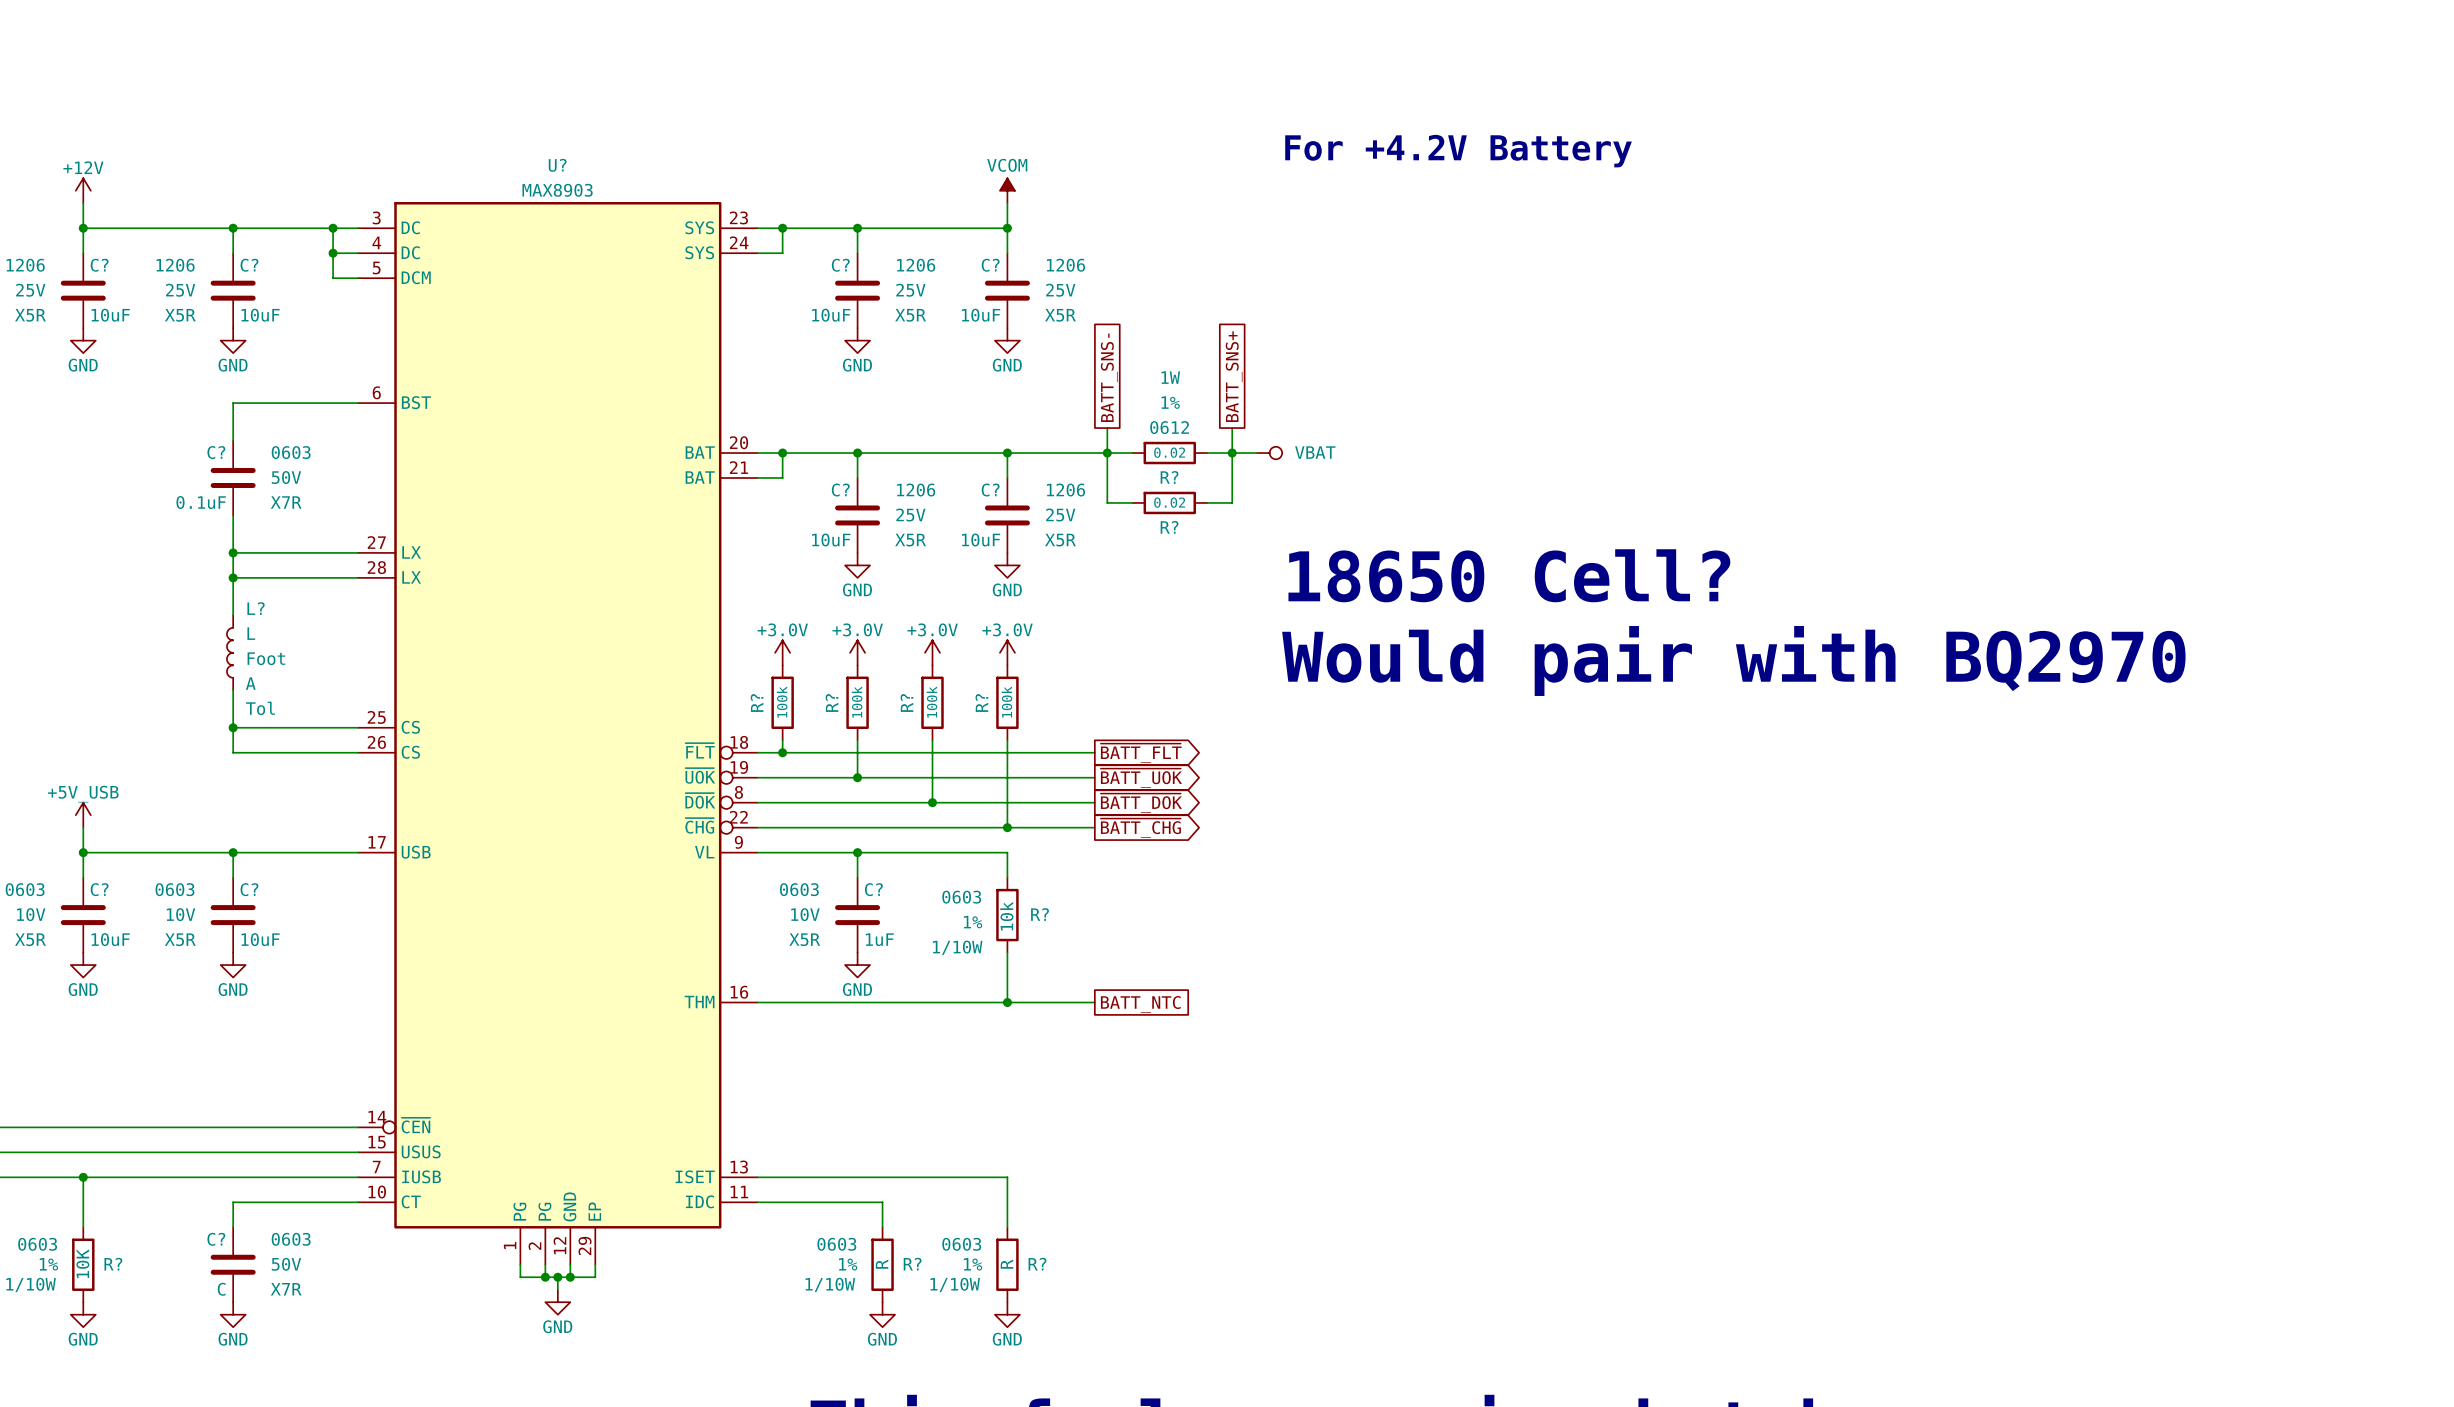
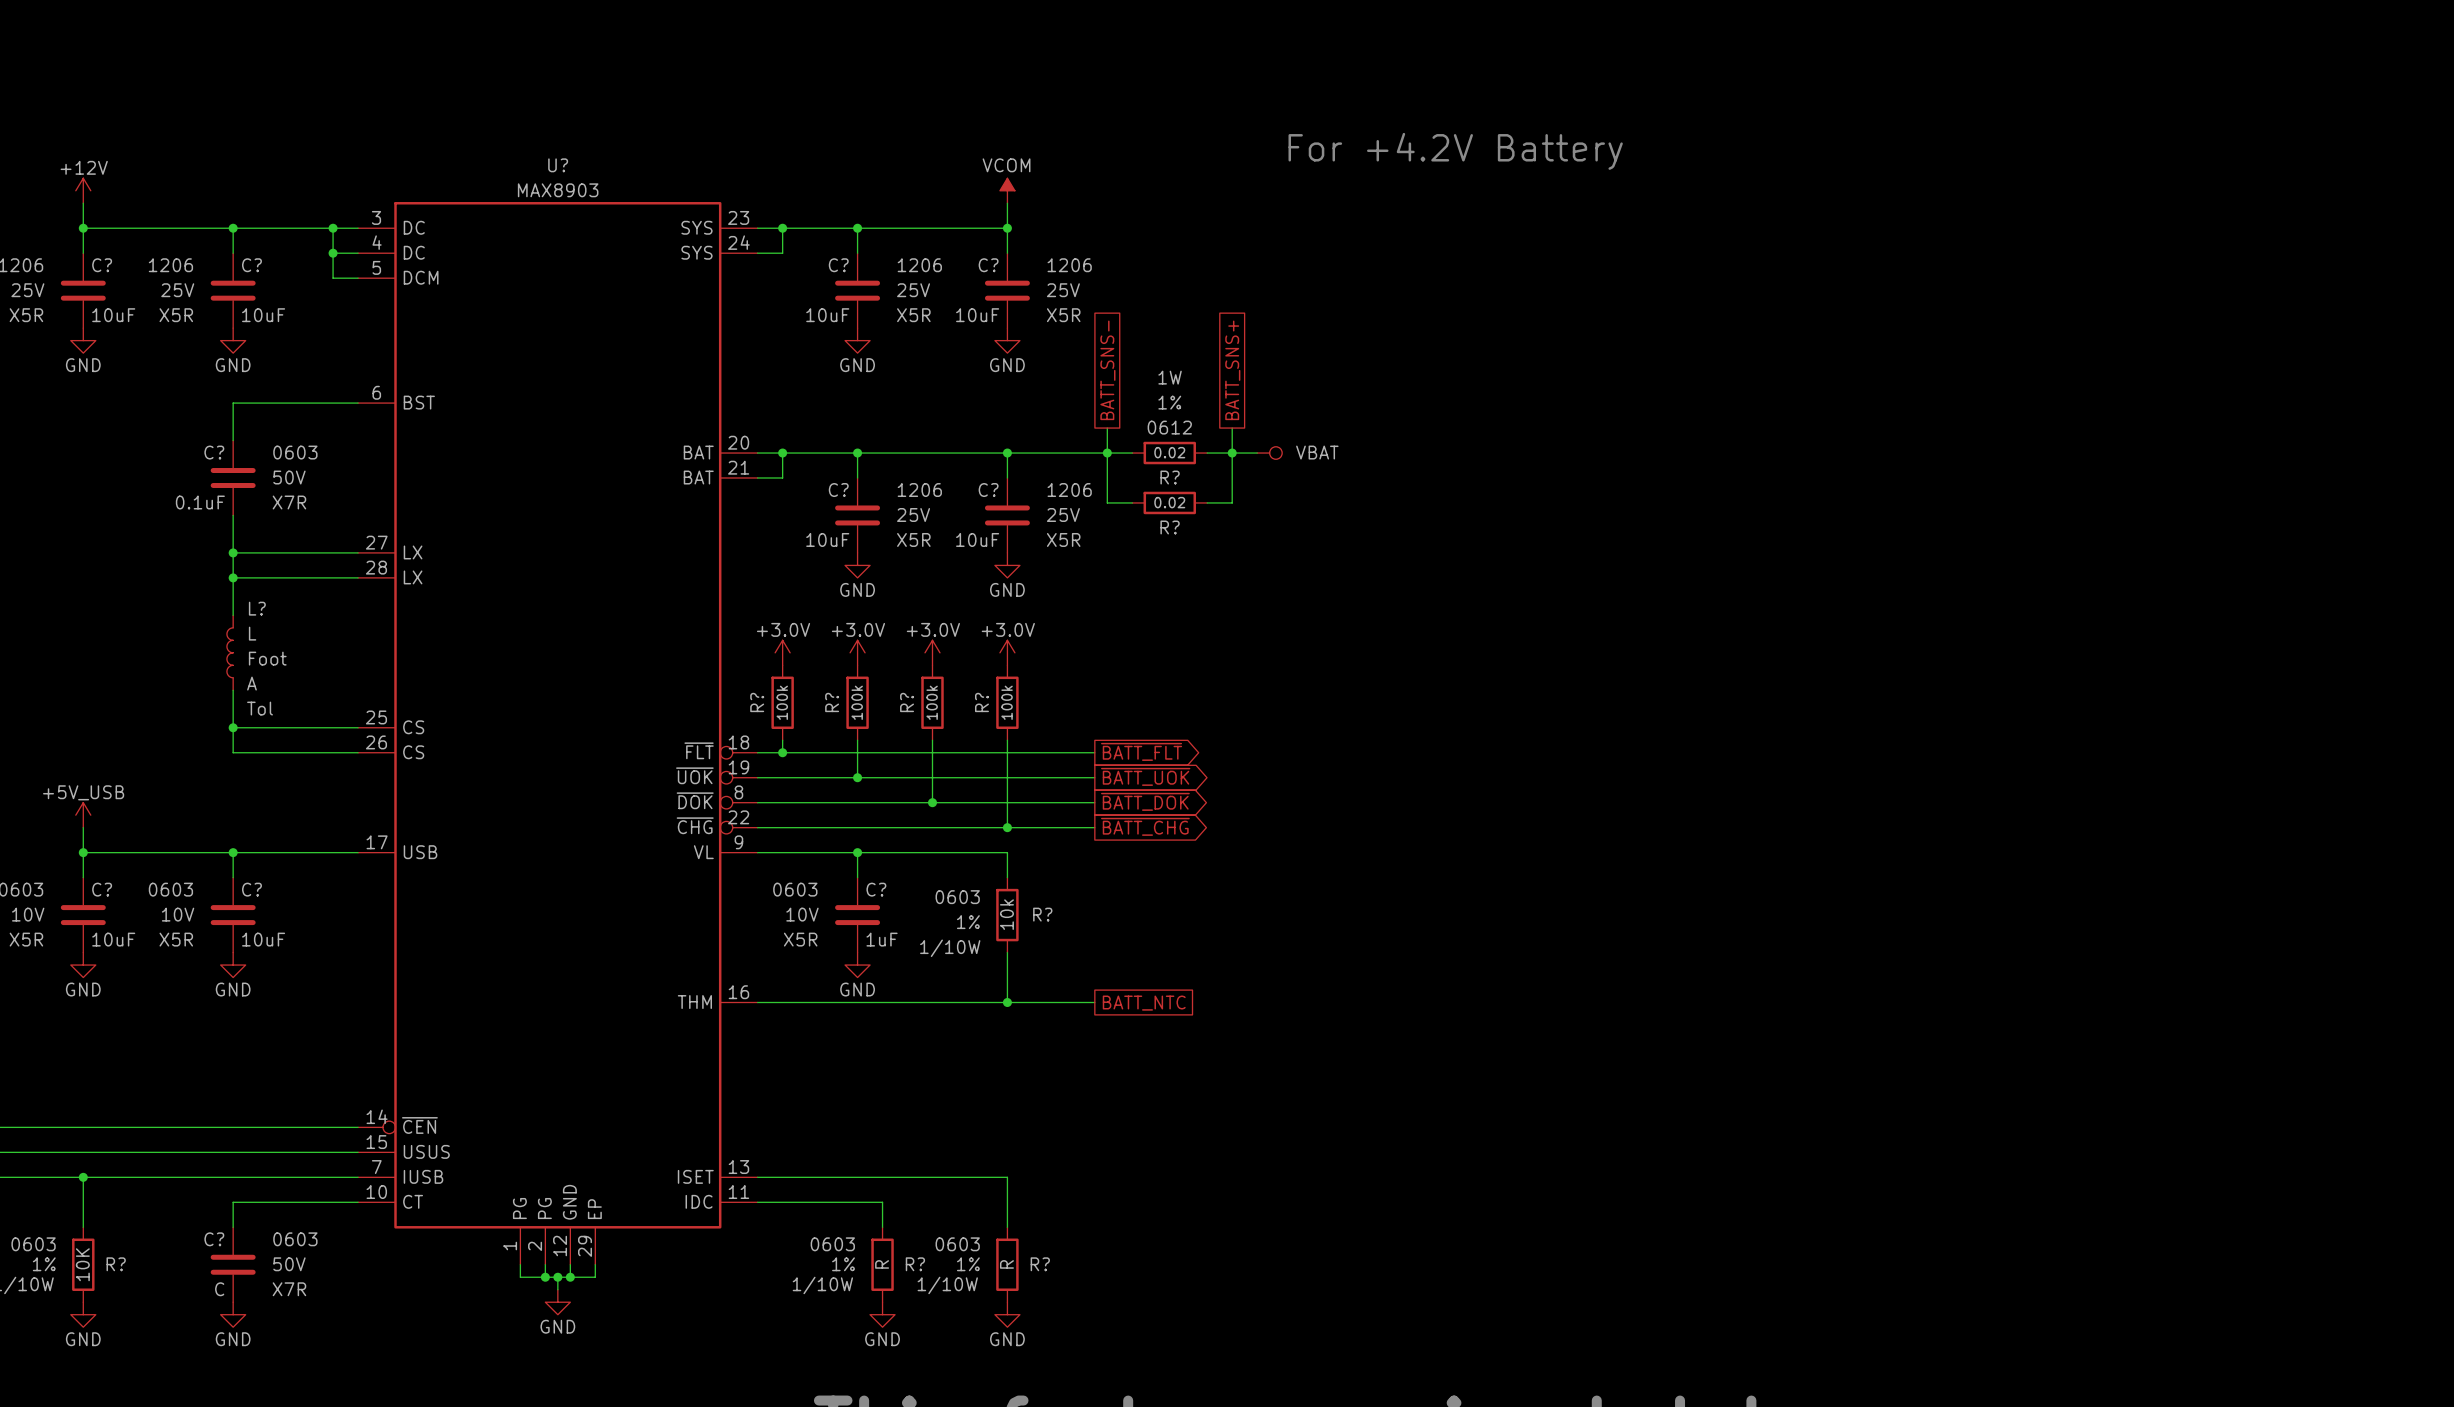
text: 18650 Cell? (1509, 575) -> none
text: Would pair with BQ2970 (1733, 661) -> none

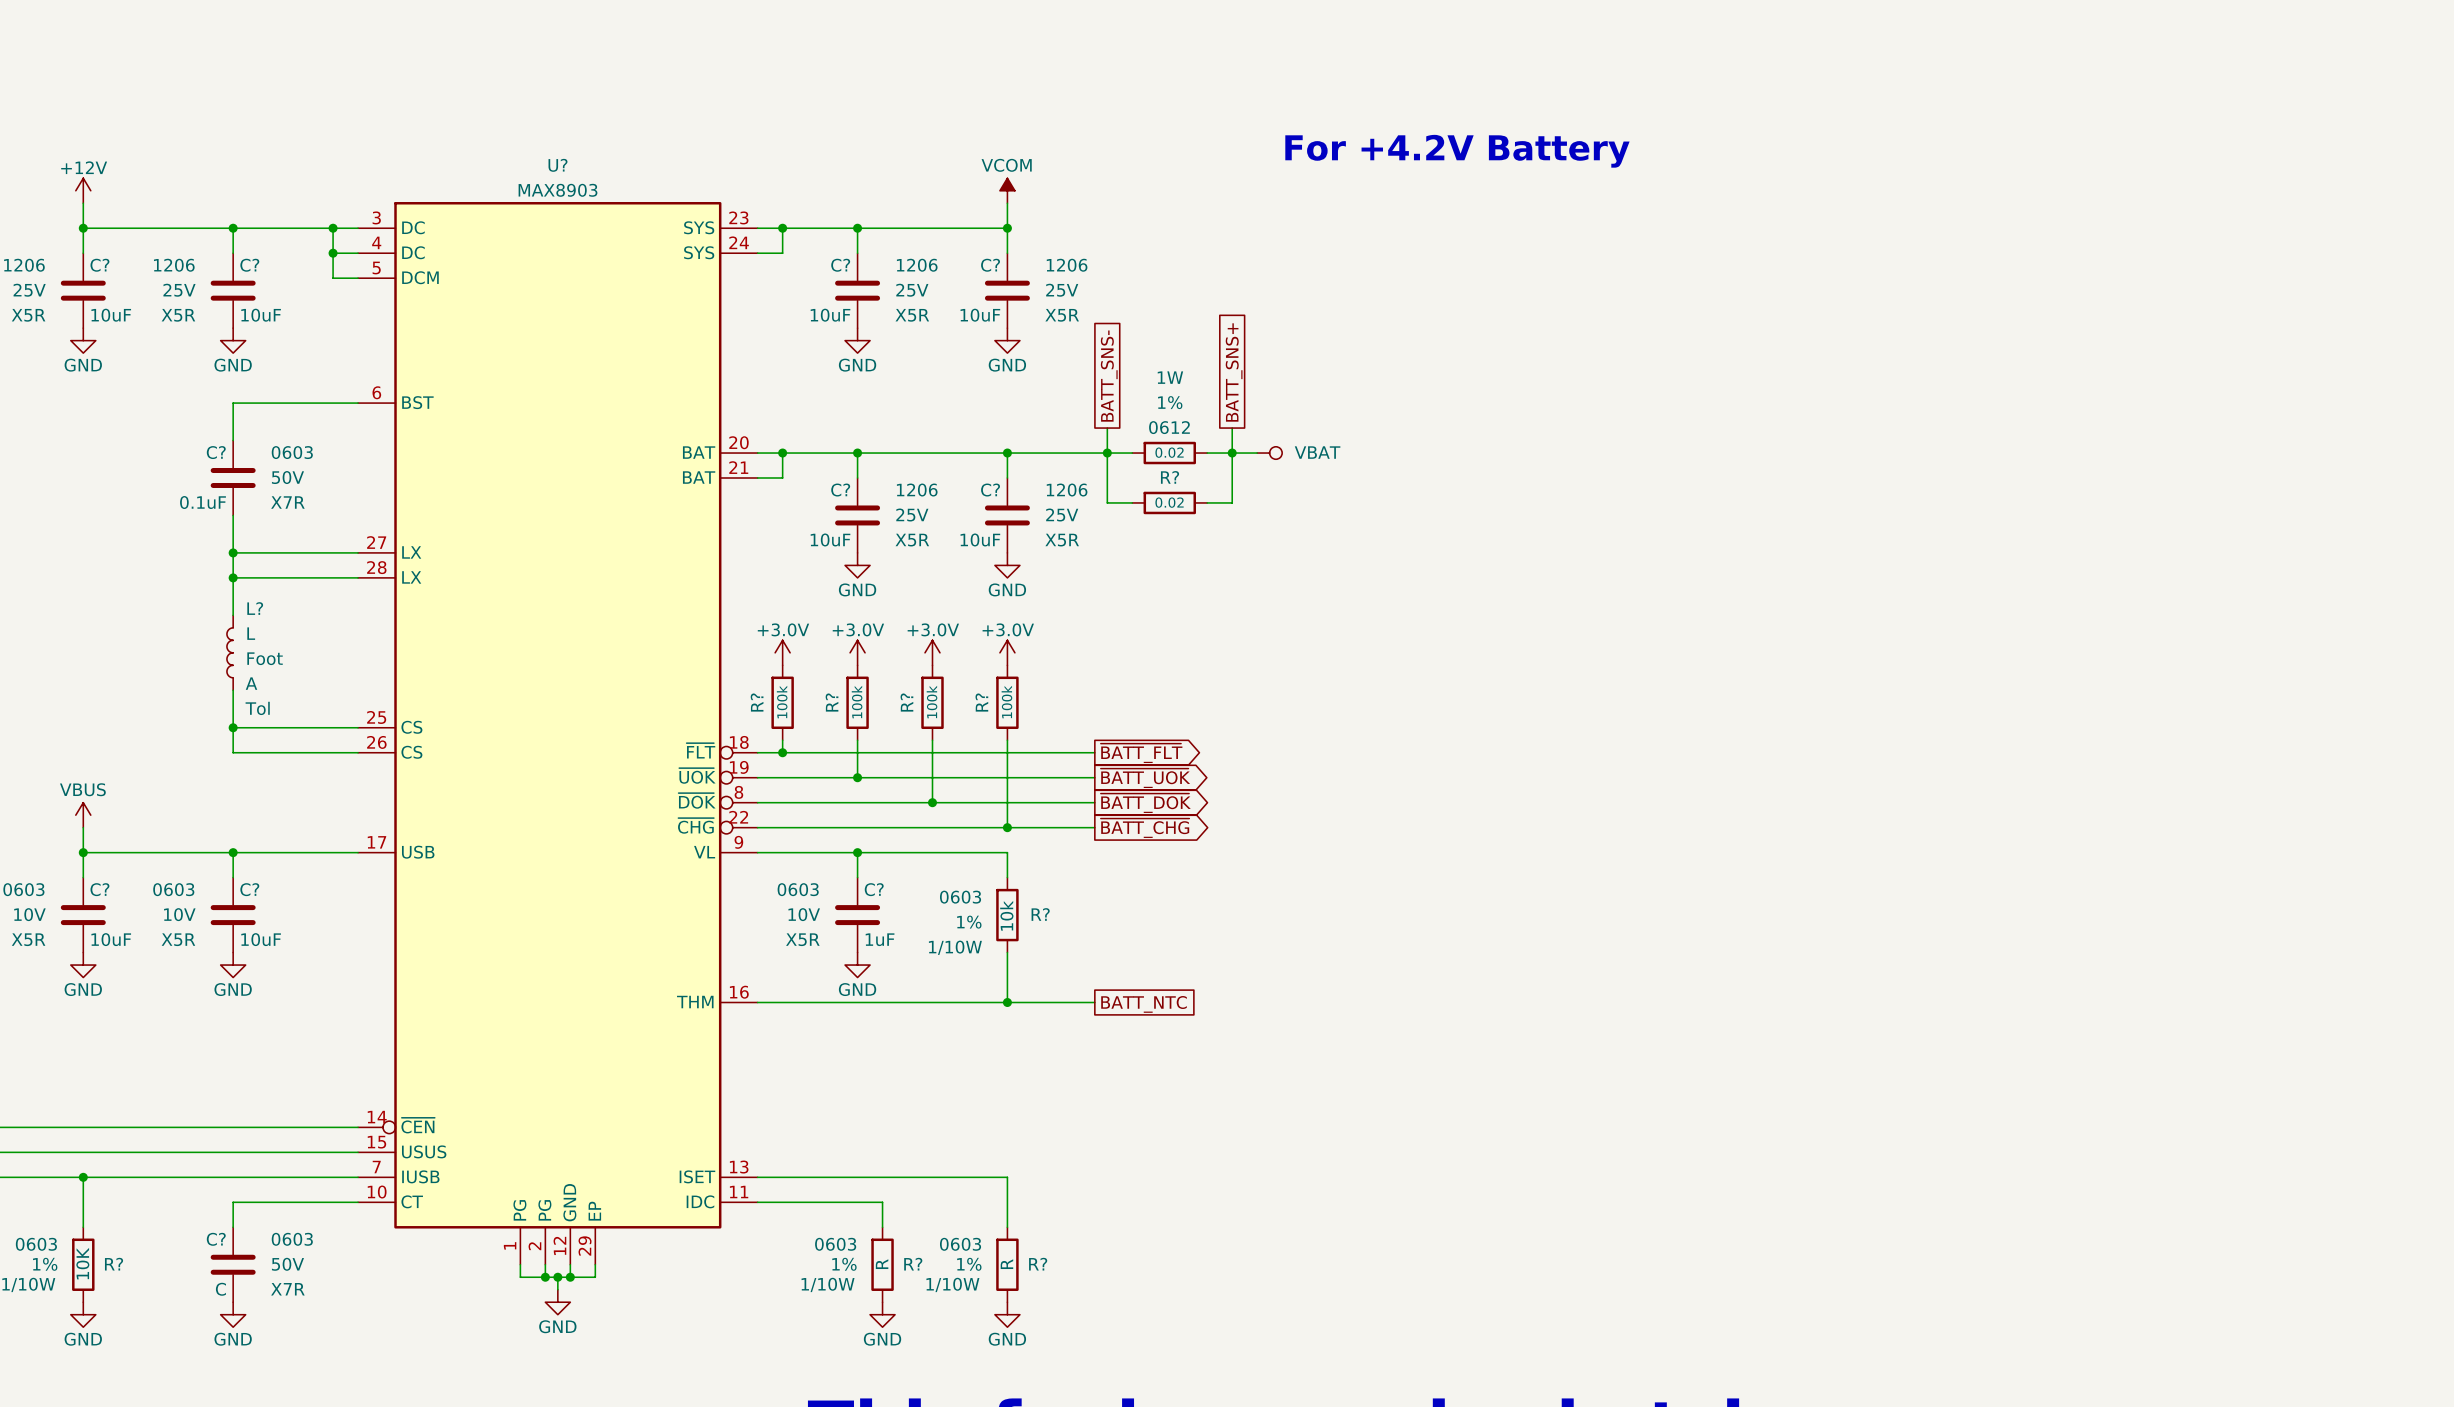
R? name: R? (1170, 527) -> none
power symbol: +5V_USB (83, 815) -> VBUS (83, 815)

